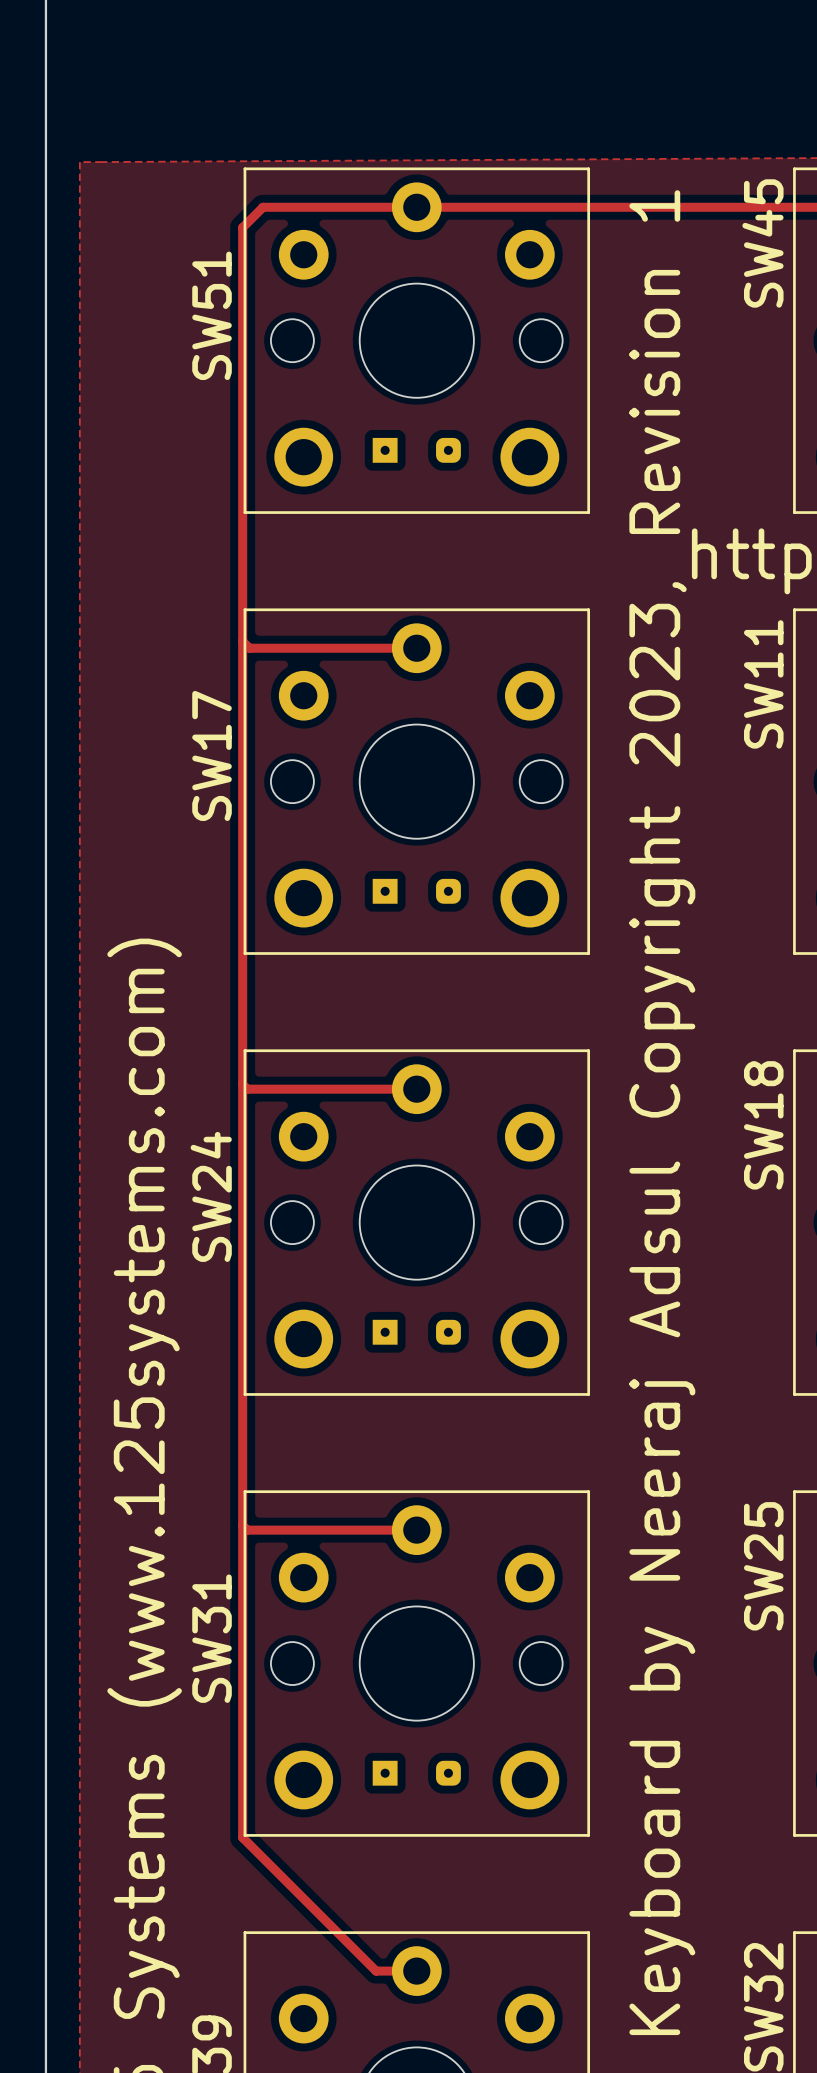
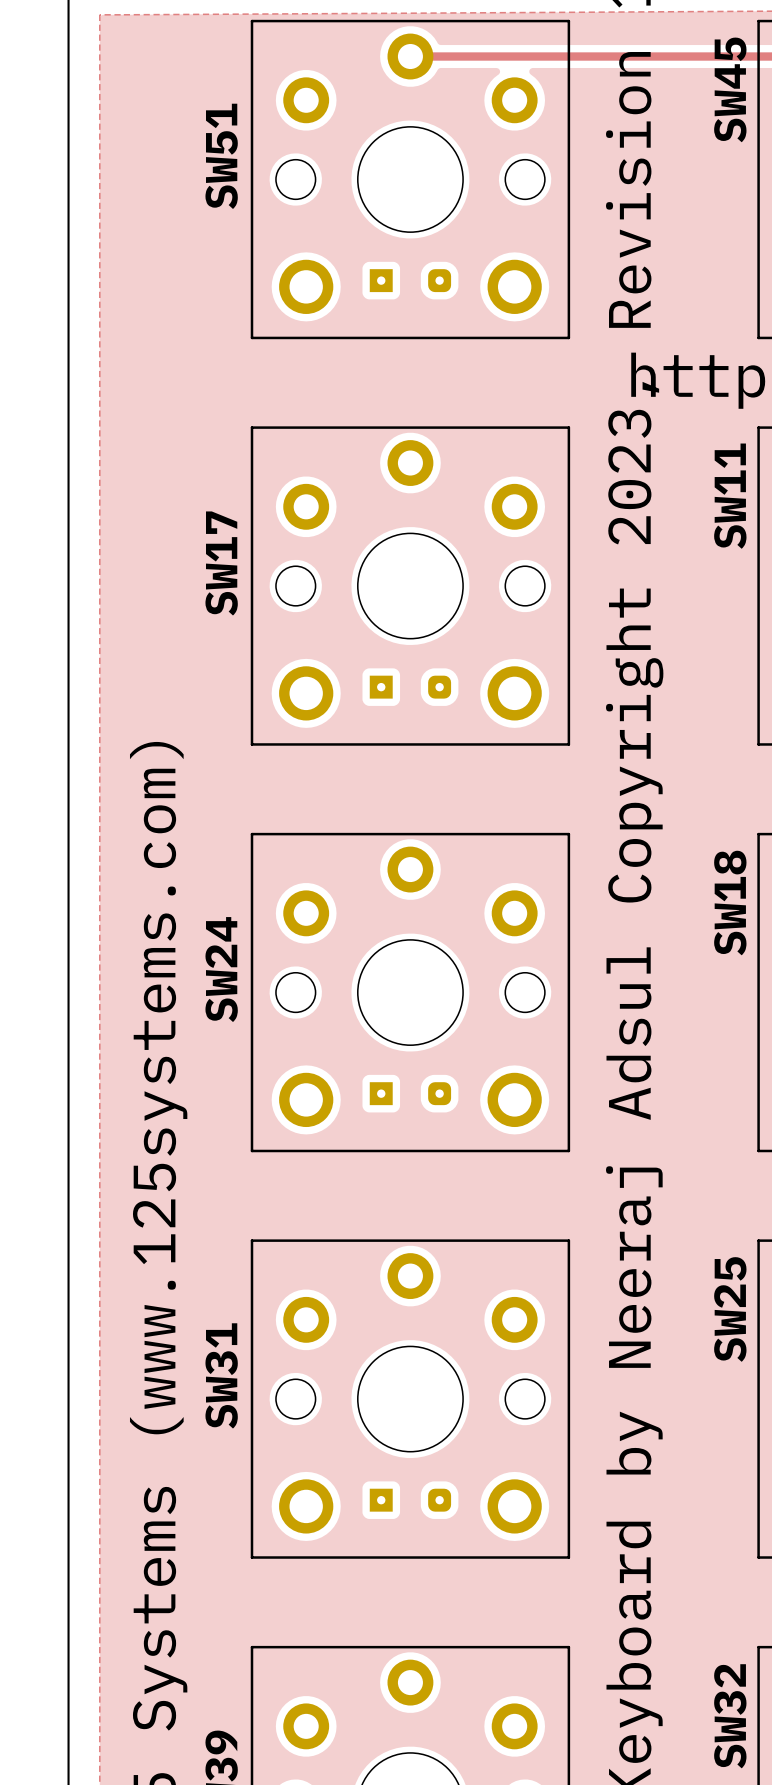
track: (416, 207) (263, 207) (242, 227) (242, 1837) (376, 1971) (416, 1971) -> none
track: (242, 641) (249, 648) (416, 648) -> none
track: (242, 1084) (247, 1089) (416, 1089) -> none
track: (242, 1525) (247, 1530) (416, 1530) -> none

